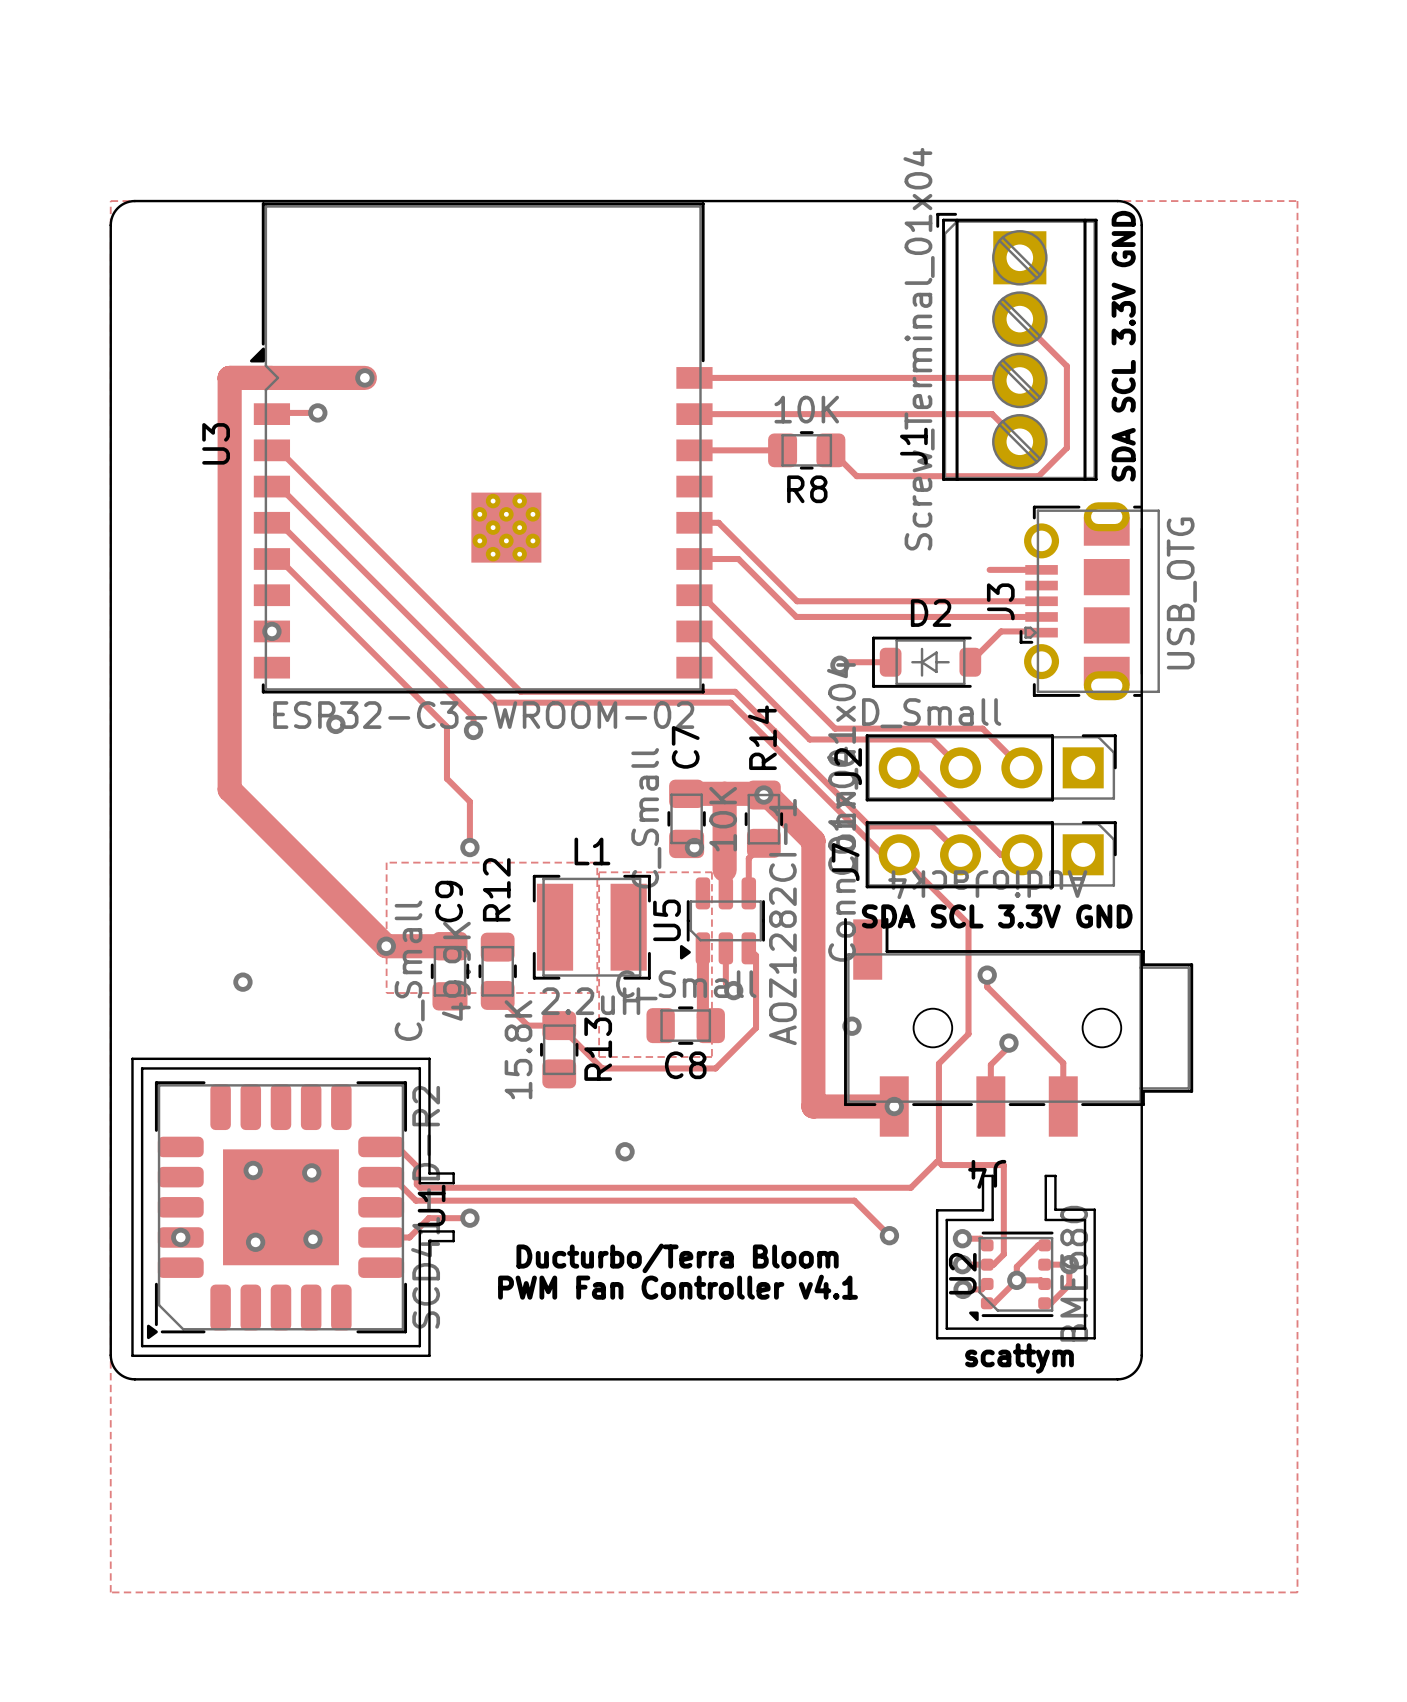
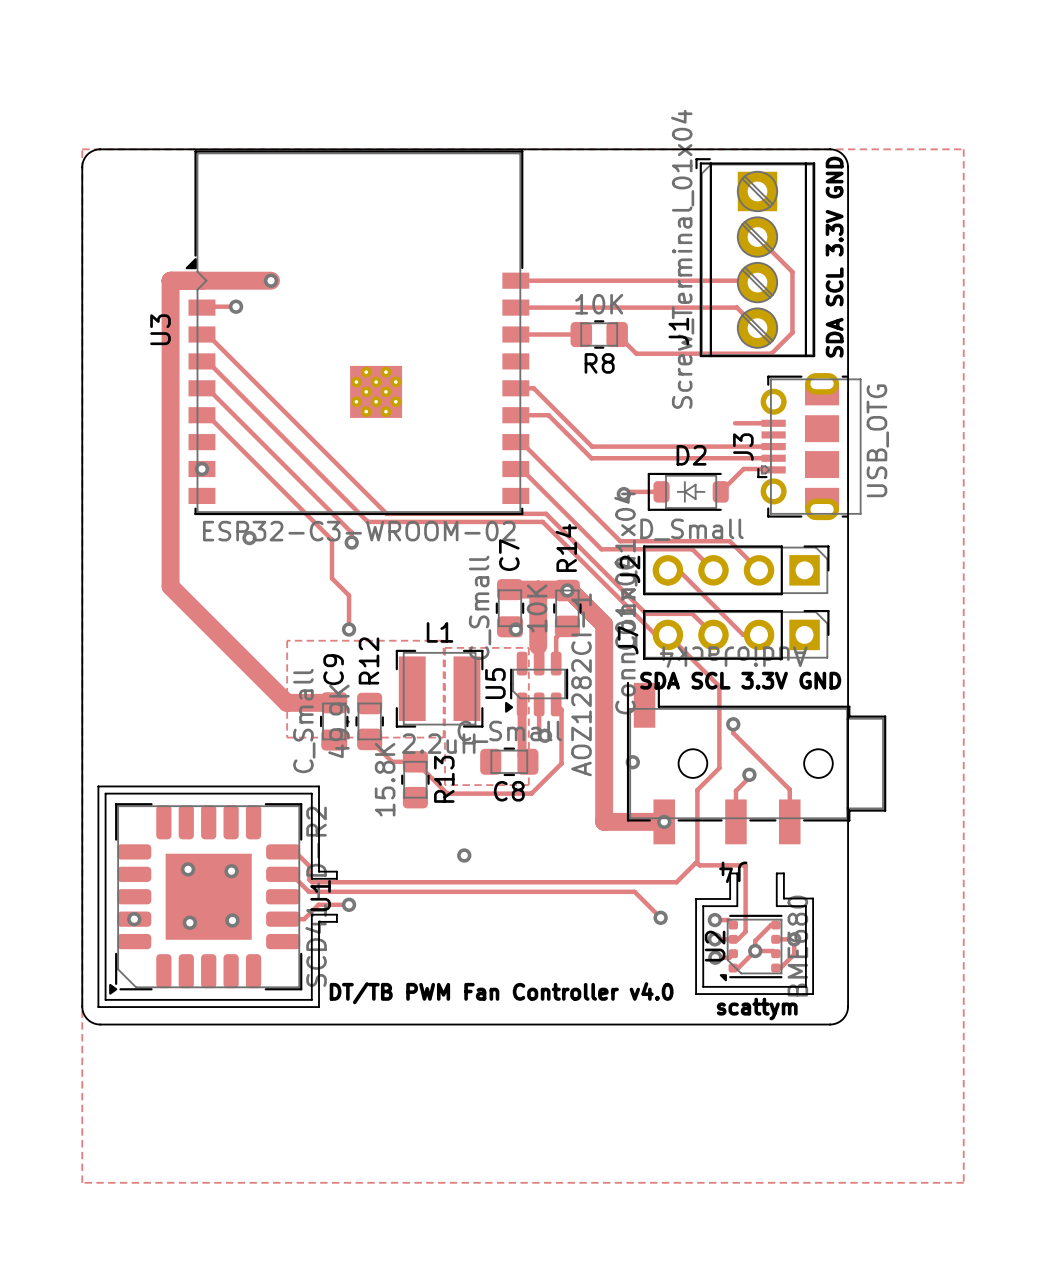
via: (386, 946) -> none
via: (242, 982) -> none
text: Ducturbo/Terra Bloom (677, 1258) -> none
text: PWM Fan Controller v4.1 (678, 1287) -> none
text: none -> DT/TB PWM Fan Controller v4.0 (501, 993)

